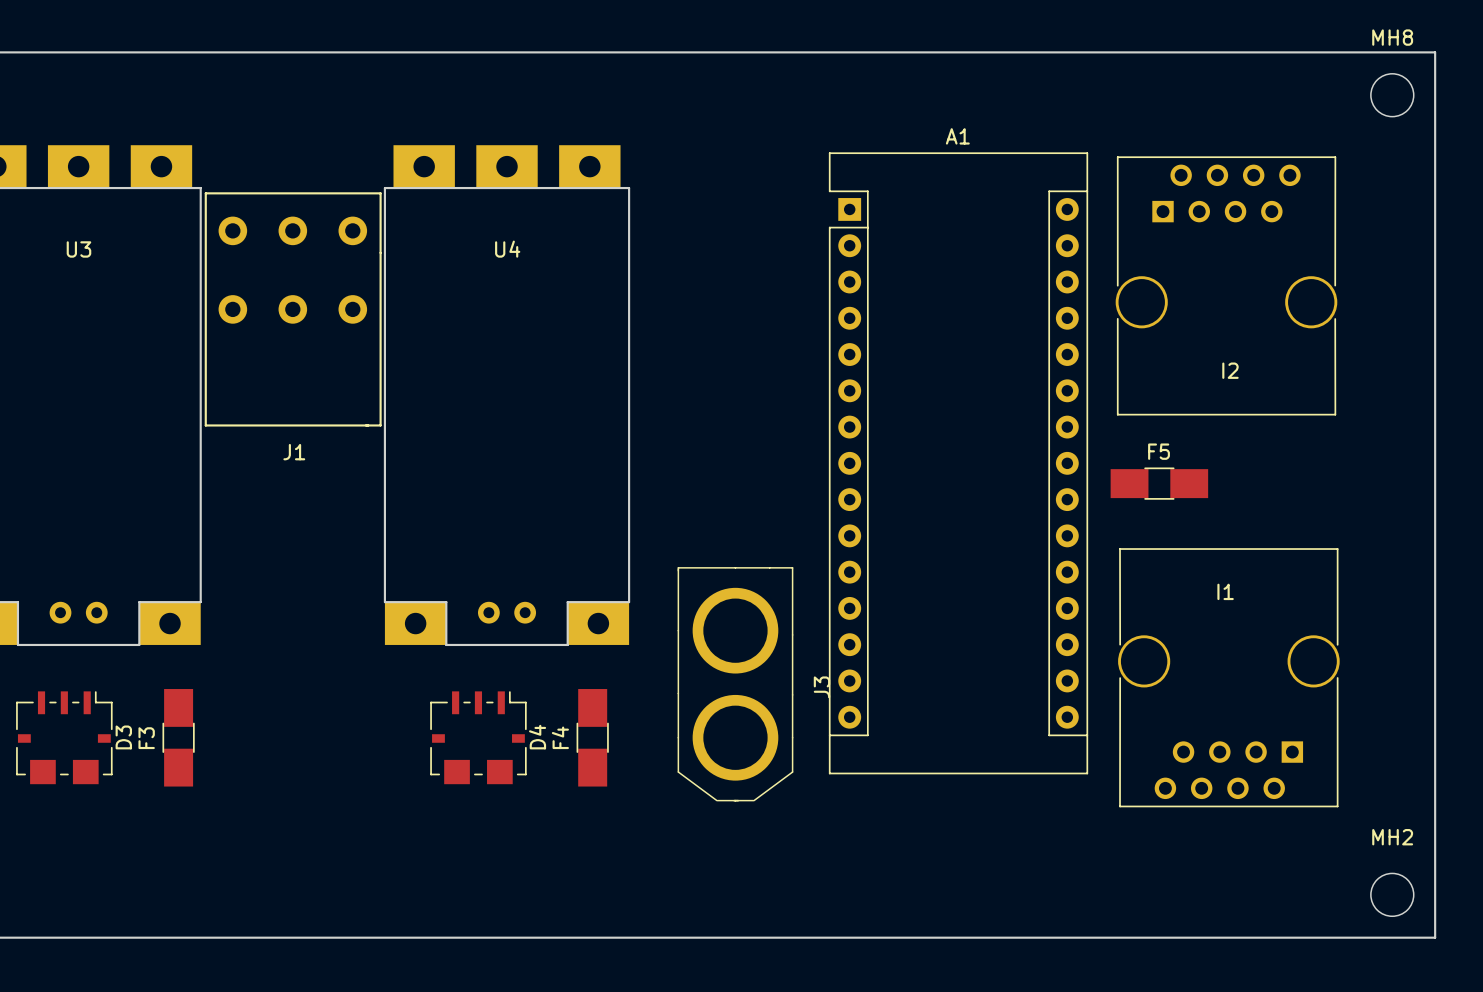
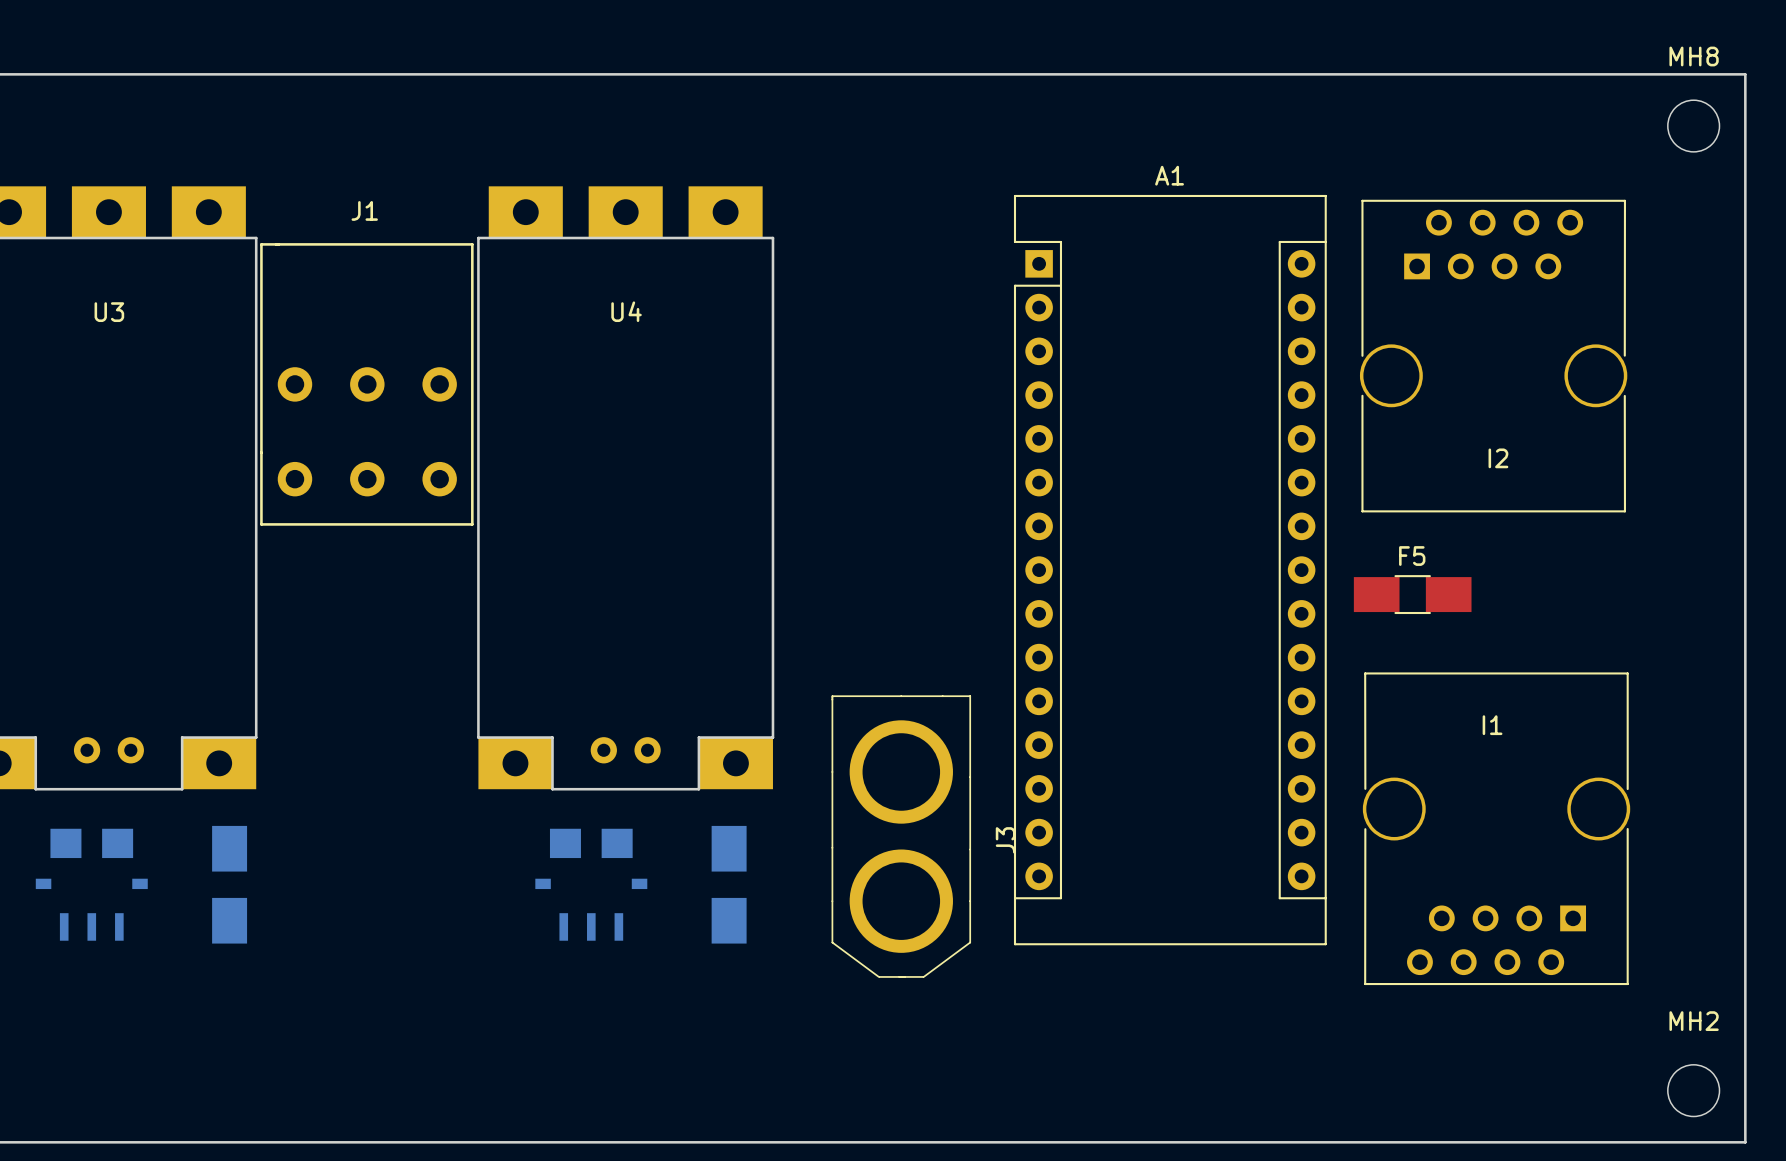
J1 rotation: 0° (293, 309) -> 180° (366, 384)
D3 side: top (64, 737) -> bottom (91, 884)
F3 side: top (178, 737) -> bottom (229, 884)
D4 side: top (478, 737) -> bottom (591, 884)
F4 side: top (592, 737) -> bottom (729, 884)

